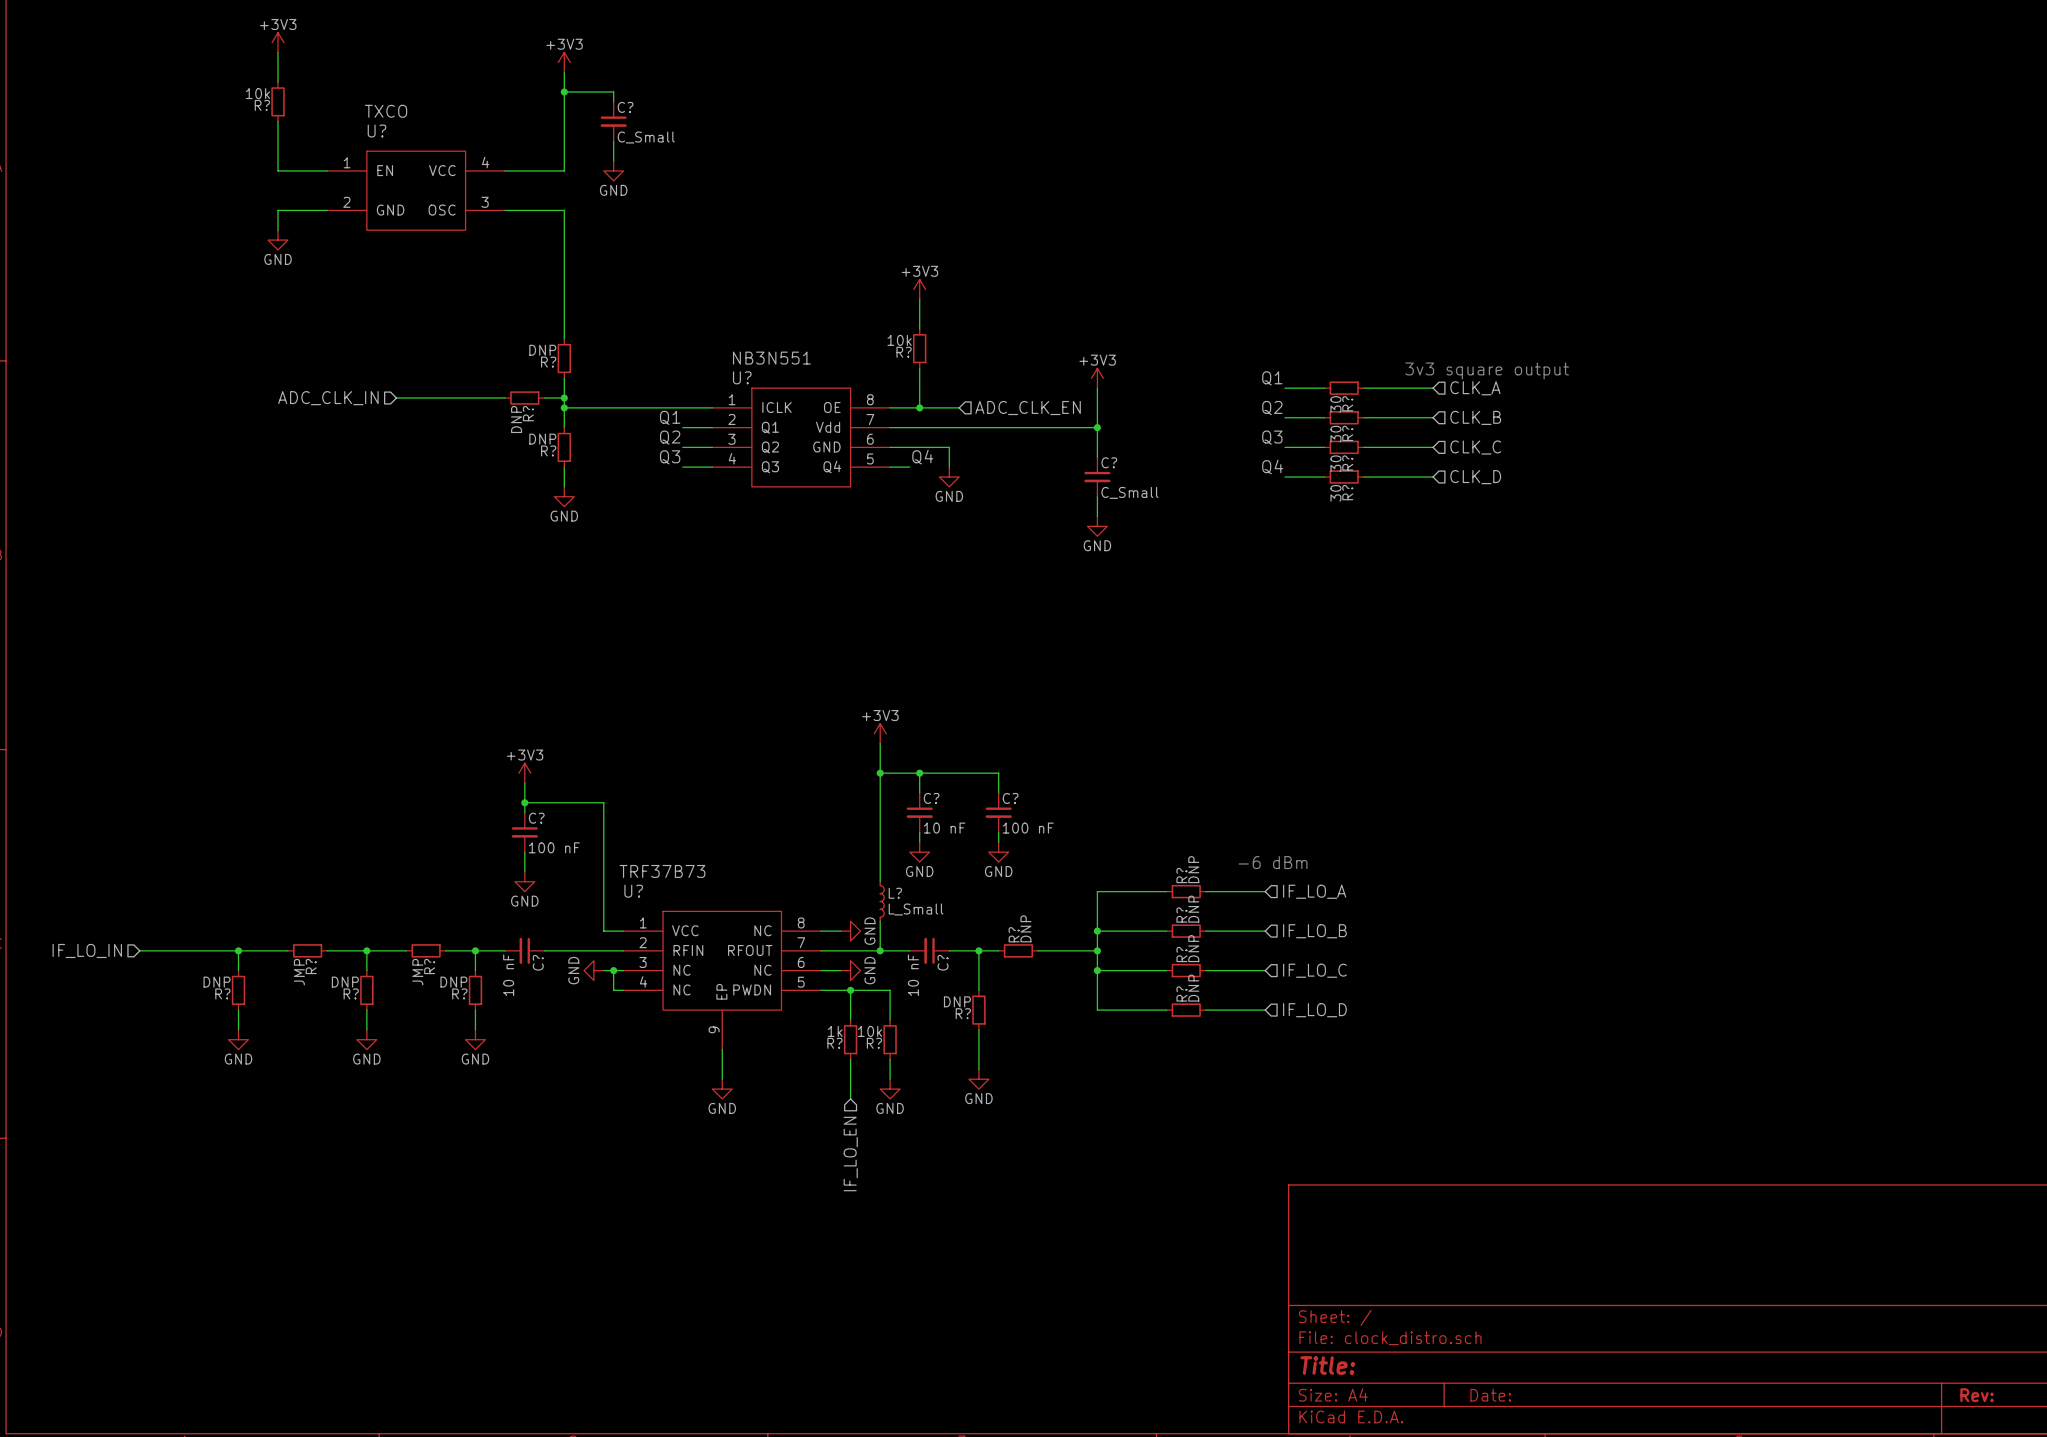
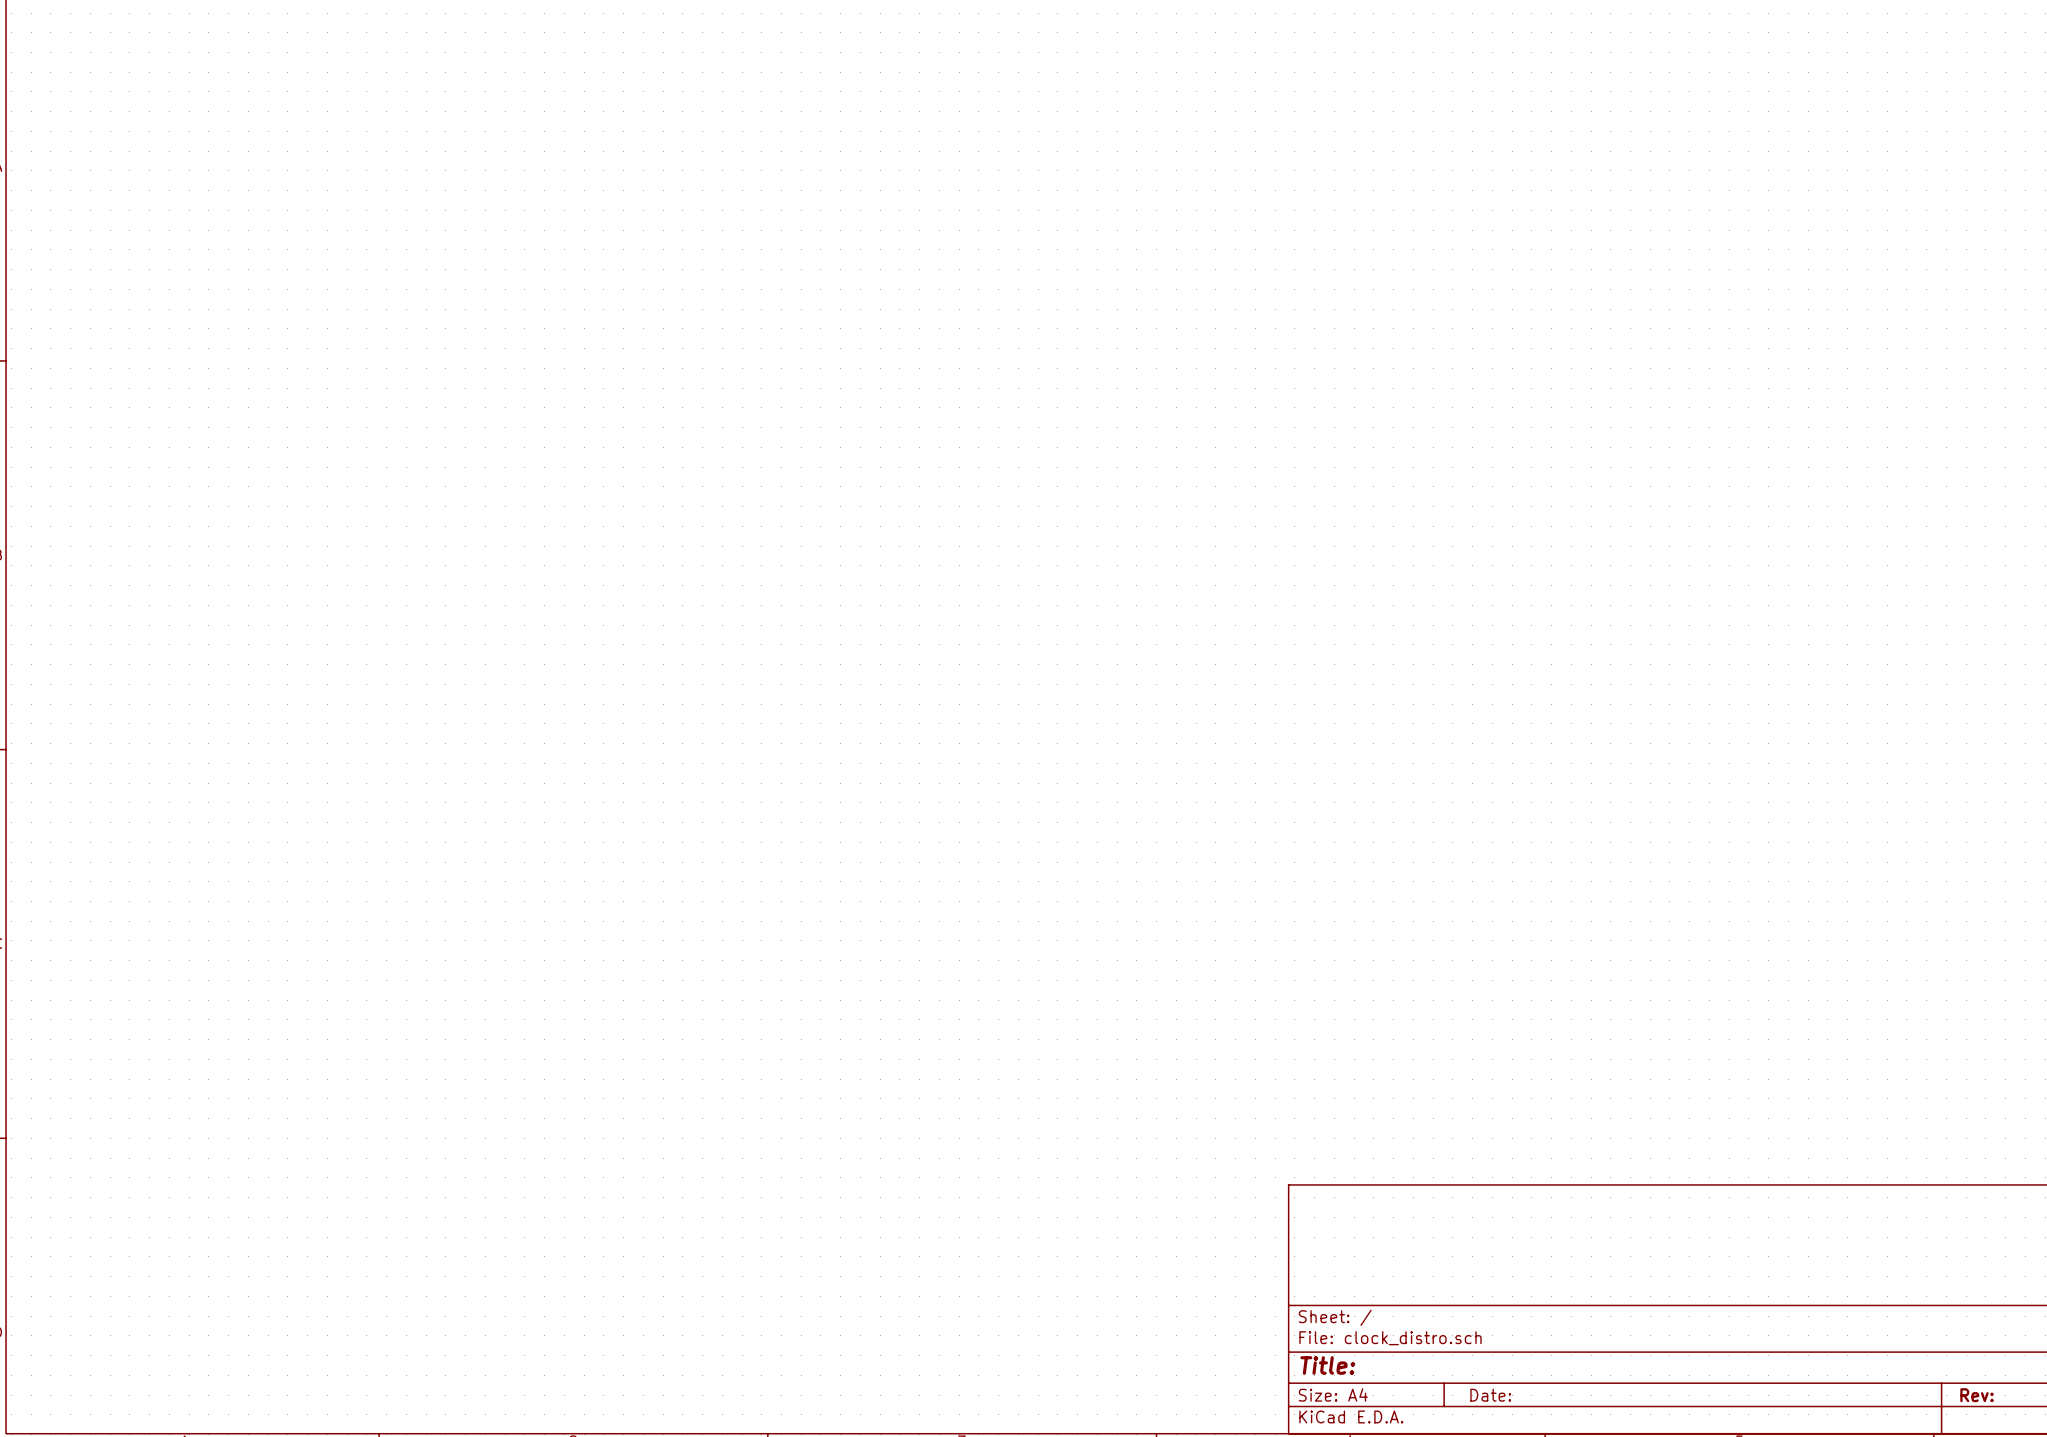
power symbol: +3V3 (278, 42) -> none
wire: (278, 52) (278, 82) -> none
power symbol: +3V3 (564, 62) -> none
wire: (564, 72) (564, 170) (505, 170) -> none
wire: (564, 91) (613, 91) (613, 101) -> none
junction: (564, 91) -> none
R?: 10k (278, 101) -> none
wire: (278, 121) (278, 170) (327, 170) -> none
C?: C_Small (613, 121) -> none
wire: (613, 141) (613, 161) -> none
power symbol: GND (613, 170) -> none
U?: TXCO (416, 190) -> none
wire: (327, 210) (278, 210) (278, 230) -> none
wire: (505, 210) (564, 210) (564, 338) -> none
power symbol: GND (278, 240) -> none
power symbol: +3V3 (919, 289) -> none
wire: (919, 299) (919, 328) -> none
R?: 10k (919, 348) -> none
R?: DNP (564, 358) -> none
wire: (919, 368) (919, 407) -> none
text: 3v3 square output (1487, 370) -> none
wire: (564, 378) (564, 427) -> none
power symbol: +3V3 (1097, 378) -> none
label: Q1 (1272, 378) -> none
wire: (1097, 388) (1097, 457) -> none
wire: (1284, 388) (1324, 388) -> none
R?: 30 (1344, 388) -> none
wire: (1363, 388) (1433, 388) -> none
hierarchical label: CLK_A (1475, 388) -> none
hierarchical label: ADC_CLK_IN (328, 398) -> none
wire: (396, 398) (505, 398) -> none
R?: DNP (524, 398) -> none
wire: (544, 398) (564, 398) -> none
junction: (564, 398) -> none
wire: (564, 407) (712, 407) -> none
junction: (564, 407) -> none
wire: (890, 407) (959, 407) -> none
junction: (919, 407) -> none
label: Q2 (1272, 407) -> none
hierarchical label: ADC_CLK_EN (1028, 408) -> none
label: Q1 (670, 417) -> none
wire: (1284, 417) (1324, 417) -> none
R?: 30 (1344, 417) -> none
wire: (1363, 417) (1433, 417) -> none
hierarchical label: CLK_B (1475, 417) -> none
wire: (682, 427) (712, 427) -> none
wire: (890, 427) (1097, 427) -> none
junction: (1097, 427) -> none
label: Q2 (670, 437) -> none
U?: NB3N551 (801, 437) -> none
label: Q3 (1272, 437) -> none
R?: DNP (564, 447) -> none
wire: (682, 447) (712, 447) -> none
wire: (890, 447) (949, 447) (949, 467) -> none
wire: (1284, 447) (1324, 447) -> none
R?: 30 (1344, 447) -> none
wire: (1363, 447) (1433, 447) -> none
hierarchical label: CLK_C (1475, 447) -> none
label: Q3 (670, 457) -> none
label: Q4 (922, 457) -> none
label: Q4 (1272, 466) -> none
wire: (564, 467) (564, 486) -> none
wire: (682, 467) (712, 467) -> none
wire: (890, 467) (909, 467) -> none
power symbol: GND (949, 477) -> none
C?: C_Small (1097, 477) -> none
wire: (1284, 477) (1324, 477) -> none
R?: 30 (1344, 477) -> none
wire: (1363, 477) (1433, 477) -> none
hierarchical label: CLK_D (1475, 477) -> none
power symbol: GND (564, 496) -> none
wire: (1097, 496) (1097, 516) -> none
power symbol: GND (1097, 526) -> none
power symbol: +3V3 (880, 733) -> none
wire: (880, 743) (880, 881) -> none
power symbol: +3V3 (524, 773) -> none
wire: (880, 773) (998, 773) (998, 792) -> none
junction: (880, 773) -> none
wire: (919, 773) (919, 792) -> none
junction: (919, 773) -> none
wire: (524, 783) (524, 812) -> none
wire: (524, 802) (603, 802) (603, 931) (623, 931) -> none
junction: (524, 802) -> none
C?: 10 nF (919, 812) -> none
C?: 100 nF (998, 812) -> none
C?: 100 nF (524, 832) -> none
wire: (919, 832) (919, 842) -> none
wire: (998, 832) (998, 842) -> none
wire: (524, 852) (524, 871) -> none
power symbol: GND (919, 852) -> none
power symbol: GND (998, 852) -> none
text: -6 dBm (1273, 862) -> none
power symbol: GND (524, 881) -> none
wire: (1166, 891) (1097, 891) (1097, 1010) (1166, 1010) -> none
R?: DNP (1186, 891) -> none
wire: (1205, 891) (1265, 891) -> none
hierarchical label: IF_LO_A (1314, 891) -> none
L?: L_Small (882, 901) -> none
wire: (880, 921) (880, 950) -> none
wire: (820, 931) (840, 931) -> none
power symbol: GND (850, 931) -> none
wire: (1097, 931) (1166, 931) -> none
junction: (1097, 931) -> none
R?: DNP (1186, 931) -> none
wire: (1205, 931) (1265, 931) -> none
hierarchical label: IF_LO_B (1314, 931) -> none
hierarchical label: IF_LO_IN (87, 950) -> none
wire: (139, 950) (287, 950) -> none
wire: (238, 950) (238, 970) -> none
junction: (238, 950) -> none
R?: JMP (307, 950) -> none
wire: (327, 950) (406, 950) -> none
wire: (366, 950) (366, 970) -> none
junction: (366, 950) -> none
R?: JMP (426, 950) -> none
wire: (445, 950) (505, 950) -> none
wire: (475, 950) (475, 970) -> none
junction: (475, 950) -> none
C?: 10 nF (524, 950) -> none
wire: (544, 950) (623, 950) -> none
wire: (820, 950) (909, 950) -> none
junction: (880, 950) -> none
C?: 10 nF (929, 950) -> none
wire: (949, 950) (998, 950) -> none
wire: (978, 950) (978, 990) -> none
junction: (978, 950) -> none
R?: DNP (1018, 950) -> none
wire: (1038, 950) (1097, 950) -> none
junction: (1097, 950) -> none
power symbol: GND (593, 970) -> none
wire: (603, 970) (623, 970) -> none
wire: (613, 970) (613, 990) (623, 990) -> none
junction: (613, 970) -> none
wire: (820, 970) (840, 970) -> none
power symbol: GND (850, 970) -> none
wire: (1097, 970) (1166, 970) -> none
junction: (1097, 970) -> none
R?: DNP (1186, 970) -> none
wire: (1205, 970) (1265, 970) -> none
hierarchical label: IF_LO_C (1314, 970) -> none
U?: TRF37B73 (722, 980) -> none
R?: DNP (238, 990) -> none
R?: DNP (366, 990) -> none
R?: DNP (475, 990) -> none
wire: (820, 990) (890, 990) (890, 1019) -> none
wire: (850, 990) (850, 1019) -> none
junction: (850, 990) -> none
wire: (238, 1010) (238, 1029) -> none
wire: (366, 1010) (366, 1029) -> none
wire: (475, 1010) (475, 1029) -> none
R?: DNP (978, 1010) -> none
R?: DNP (1186, 1010) -> none
wire: (1205, 1010) (1265, 1010) -> none
hierarchical label: IF_LO_D (1314, 1010) -> none
wire: (978, 1029) (978, 1069) -> none
power symbol: GND (238, 1039) -> none
power symbol: GND (366, 1039) -> none
power symbol: GND (475, 1039) -> none
R?: 1k (850, 1039) -> none
R?: 10k (890, 1039) -> none
wire: (722, 1049) (722, 1079) -> none
wire: (850, 1059) (850, 1098) -> none
wire: (890, 1059) (890, 1079) -> none
power symbol: GND (978, 1079) -> none
power symbol: GND (722, 1089) -> none
power symbol: GND (890, 1089) -> none
hierarchical label: IF_LO_EN (850, 1154) -> none

